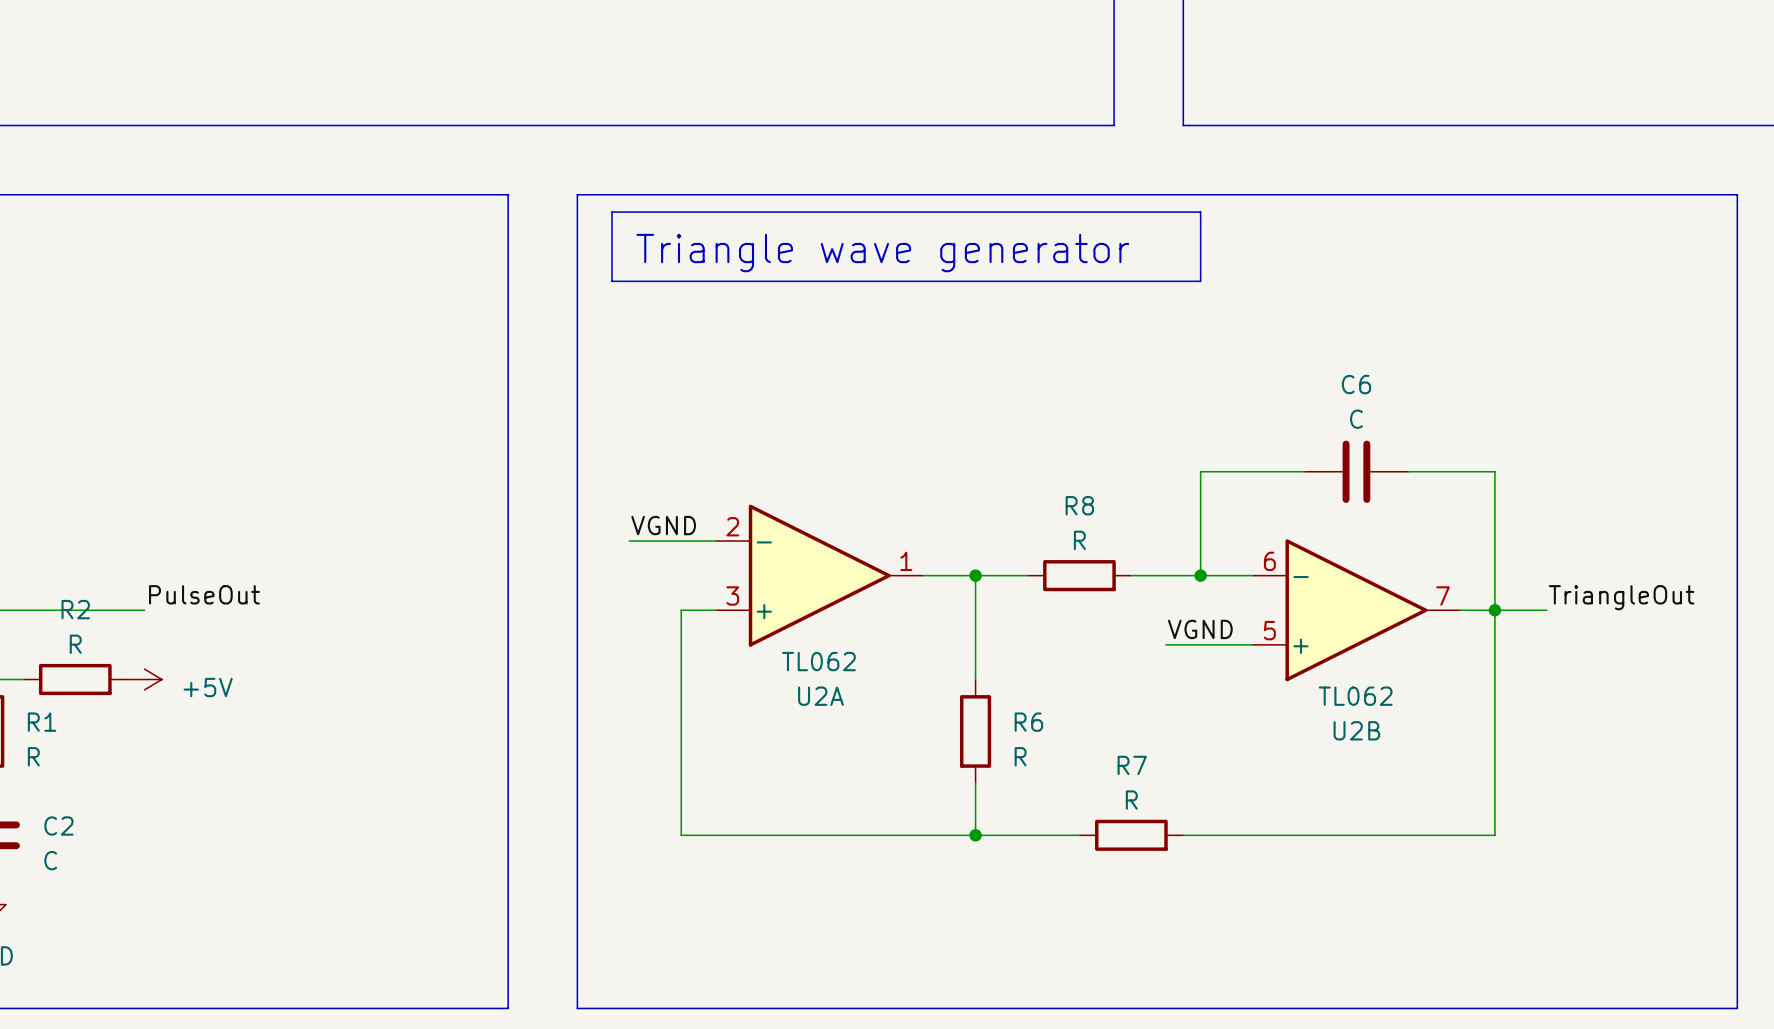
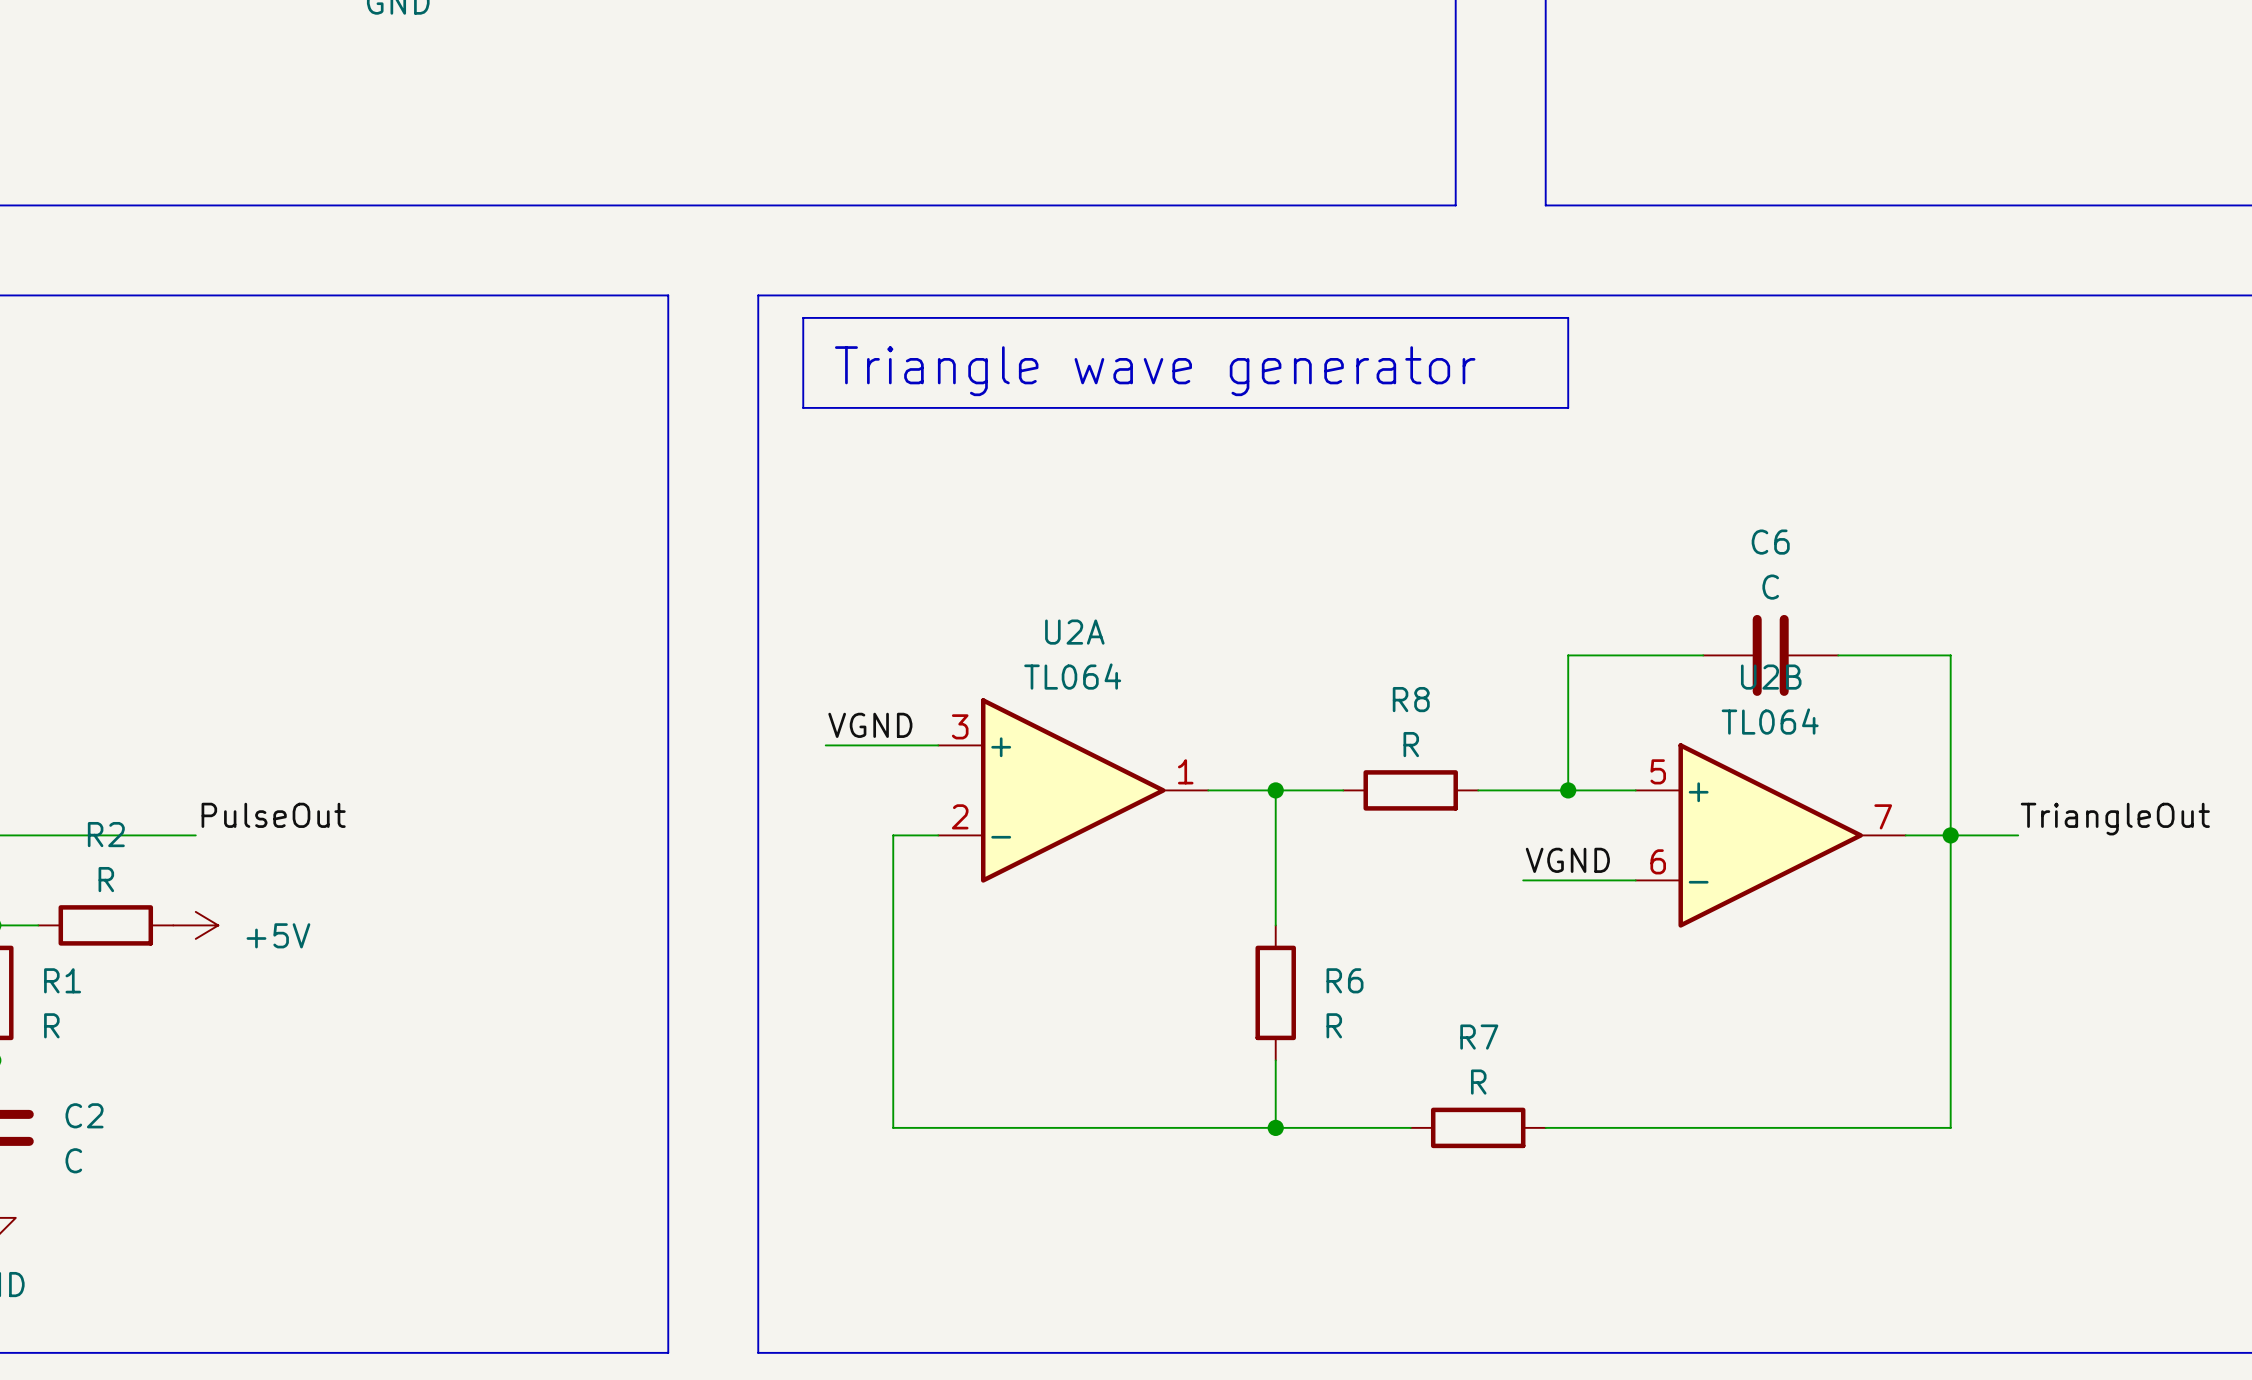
U2A flip: as is (819, 575) -> up-down (1073, 790)
U2B flip: as is (1356, 610) -> up-down (1770, 835)
U2A value: TL062 (818, 661) -> TL064 (1072, 676)
U2B value: TL062 (1355, 696) -> TL064 (1770, 721)

